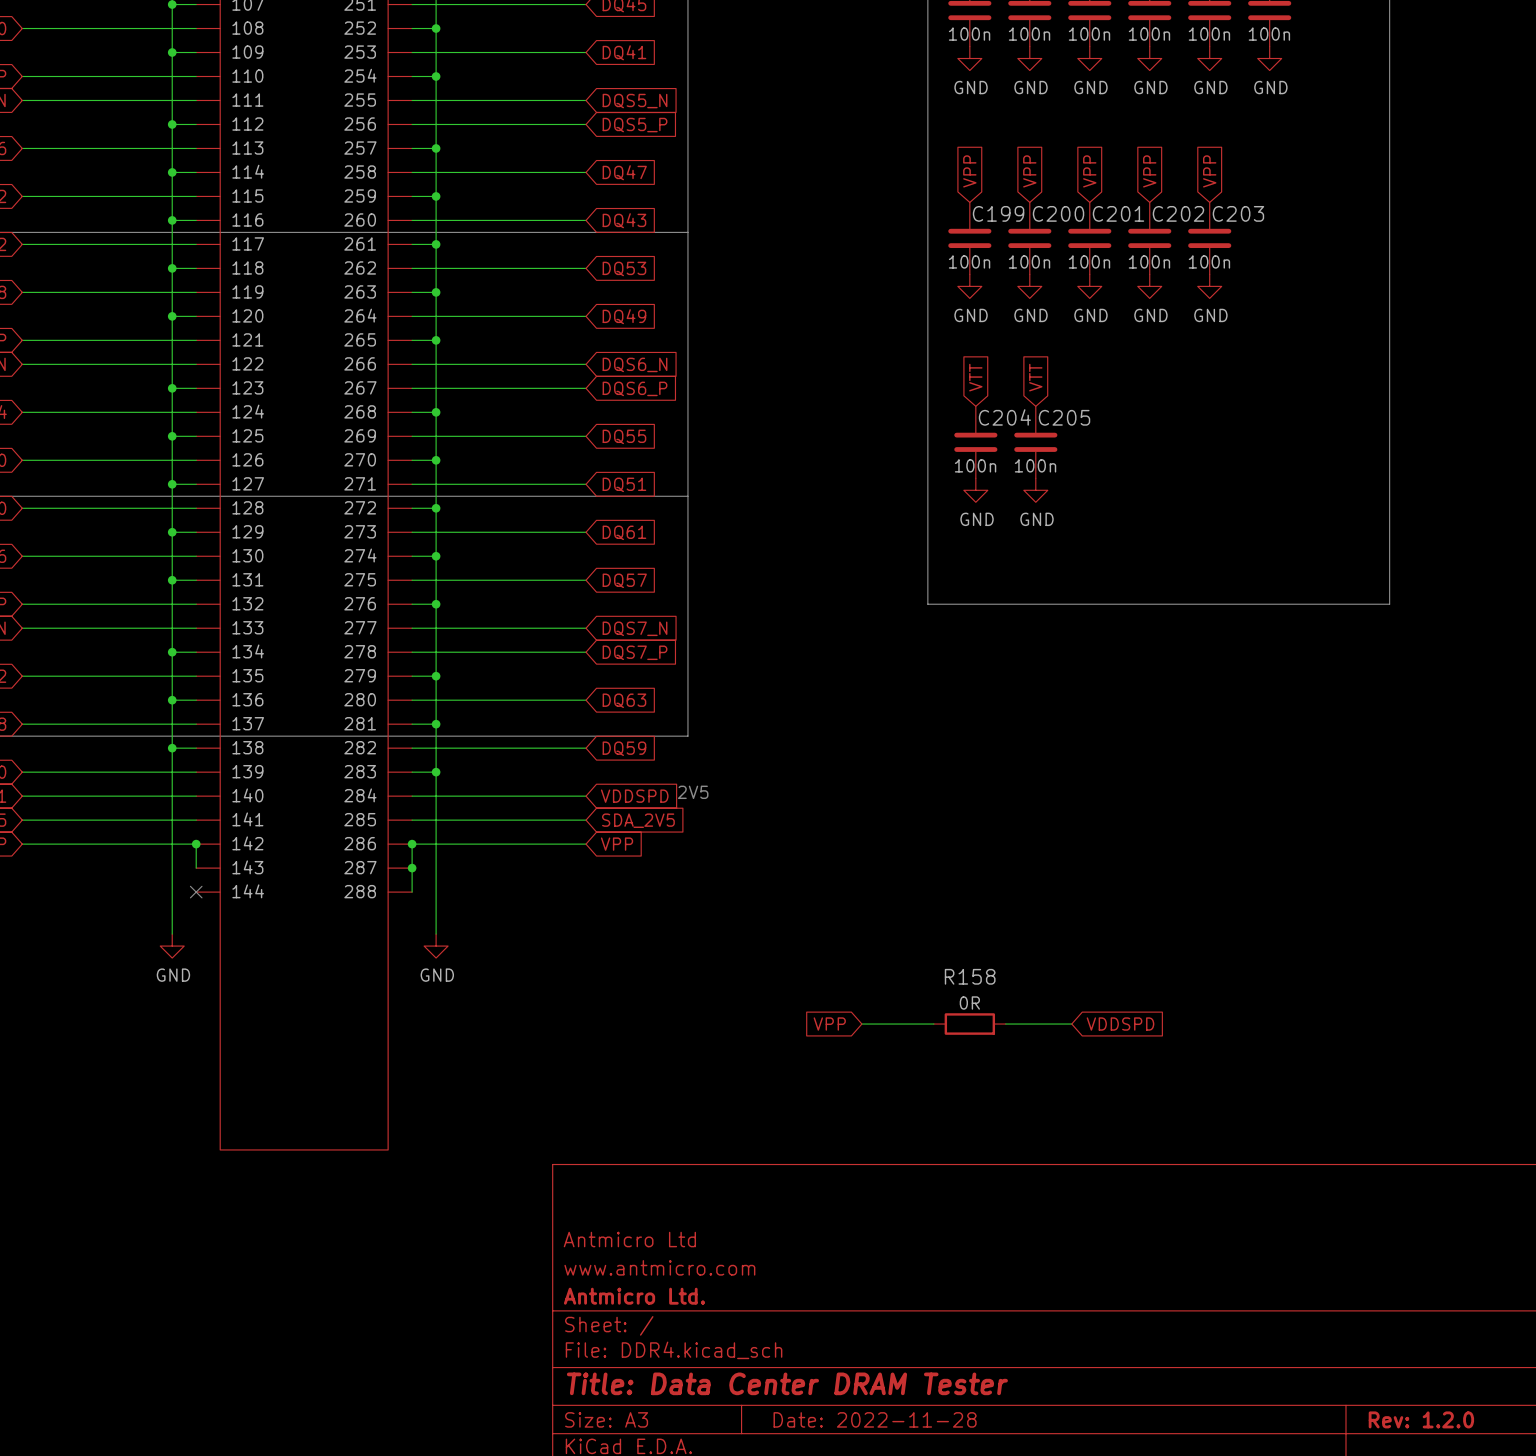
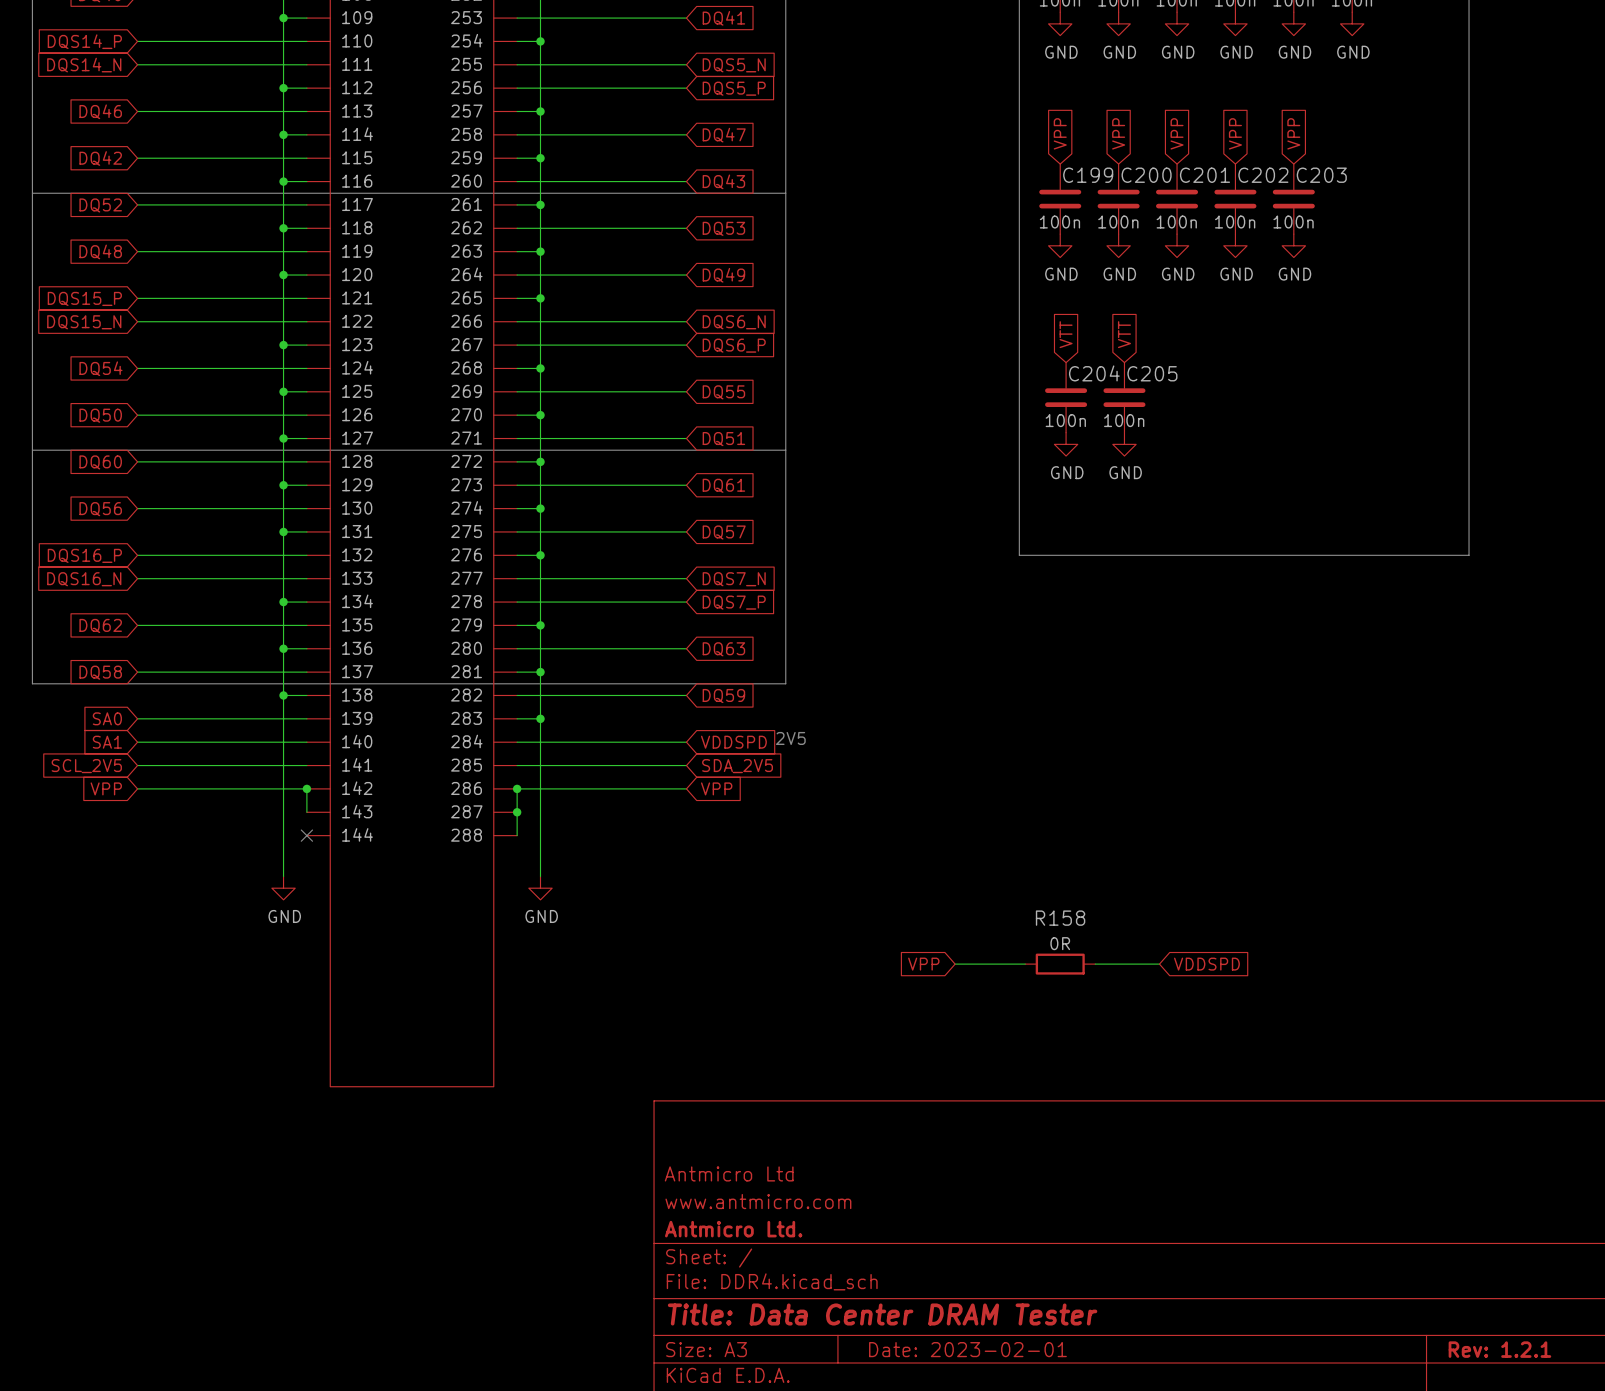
title block: Date: 2022-11-28 (875, 1419) -> Date: 2023-02-01 (967, 1349)
title block: Rev: 1.2.0 (1421, 1419) -> Rev: 1.2.1 (1499, 1349)

